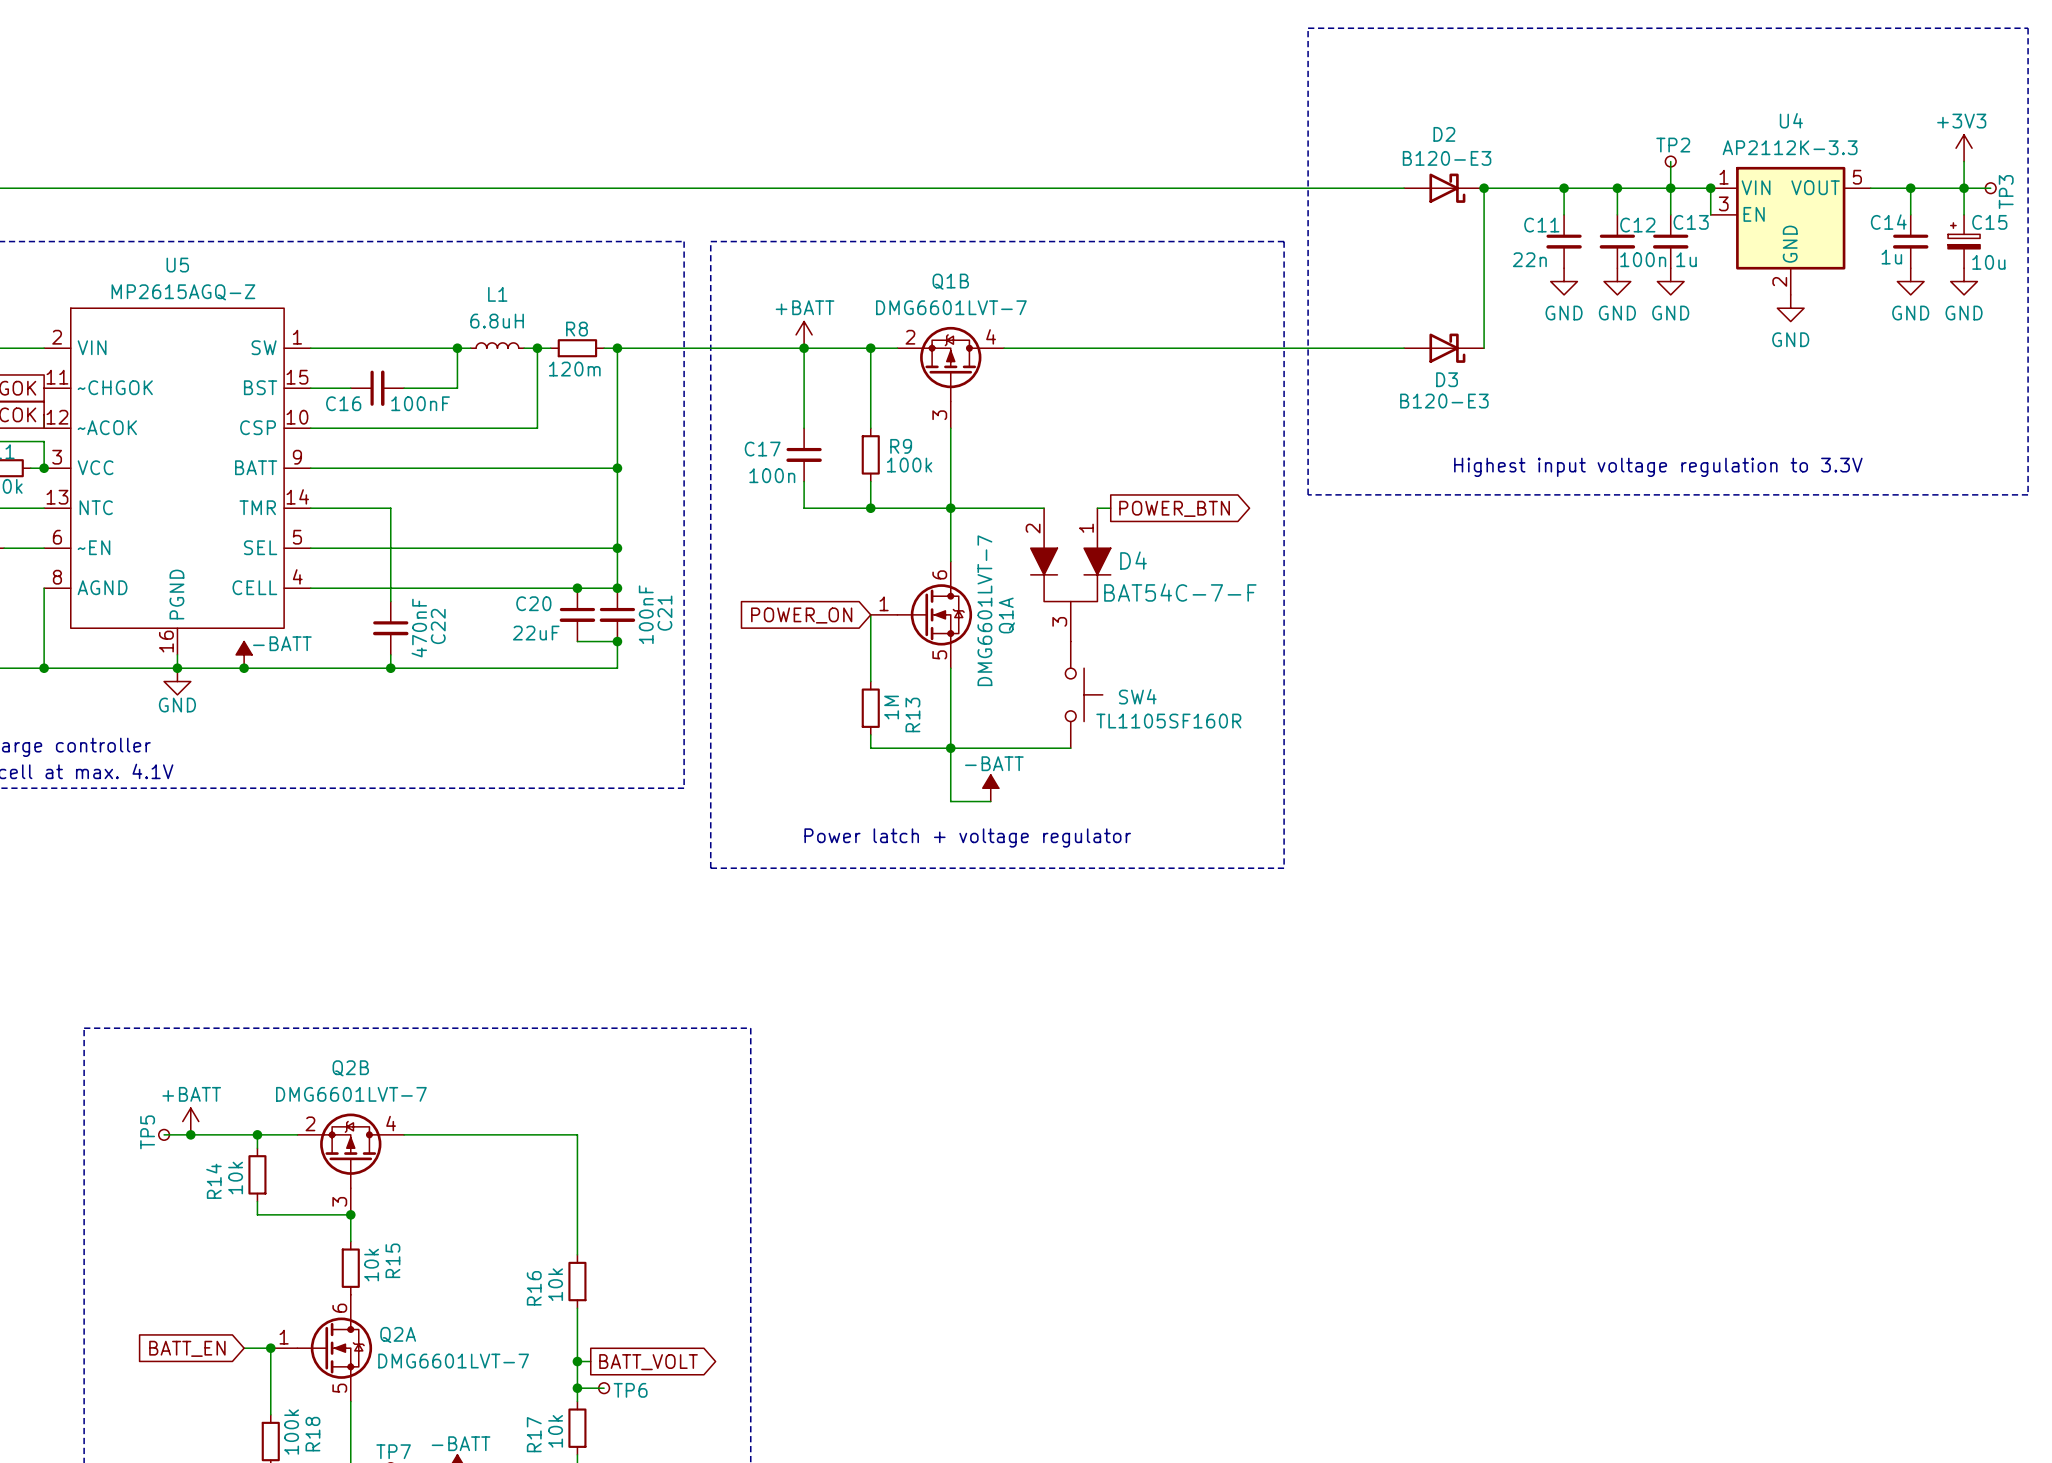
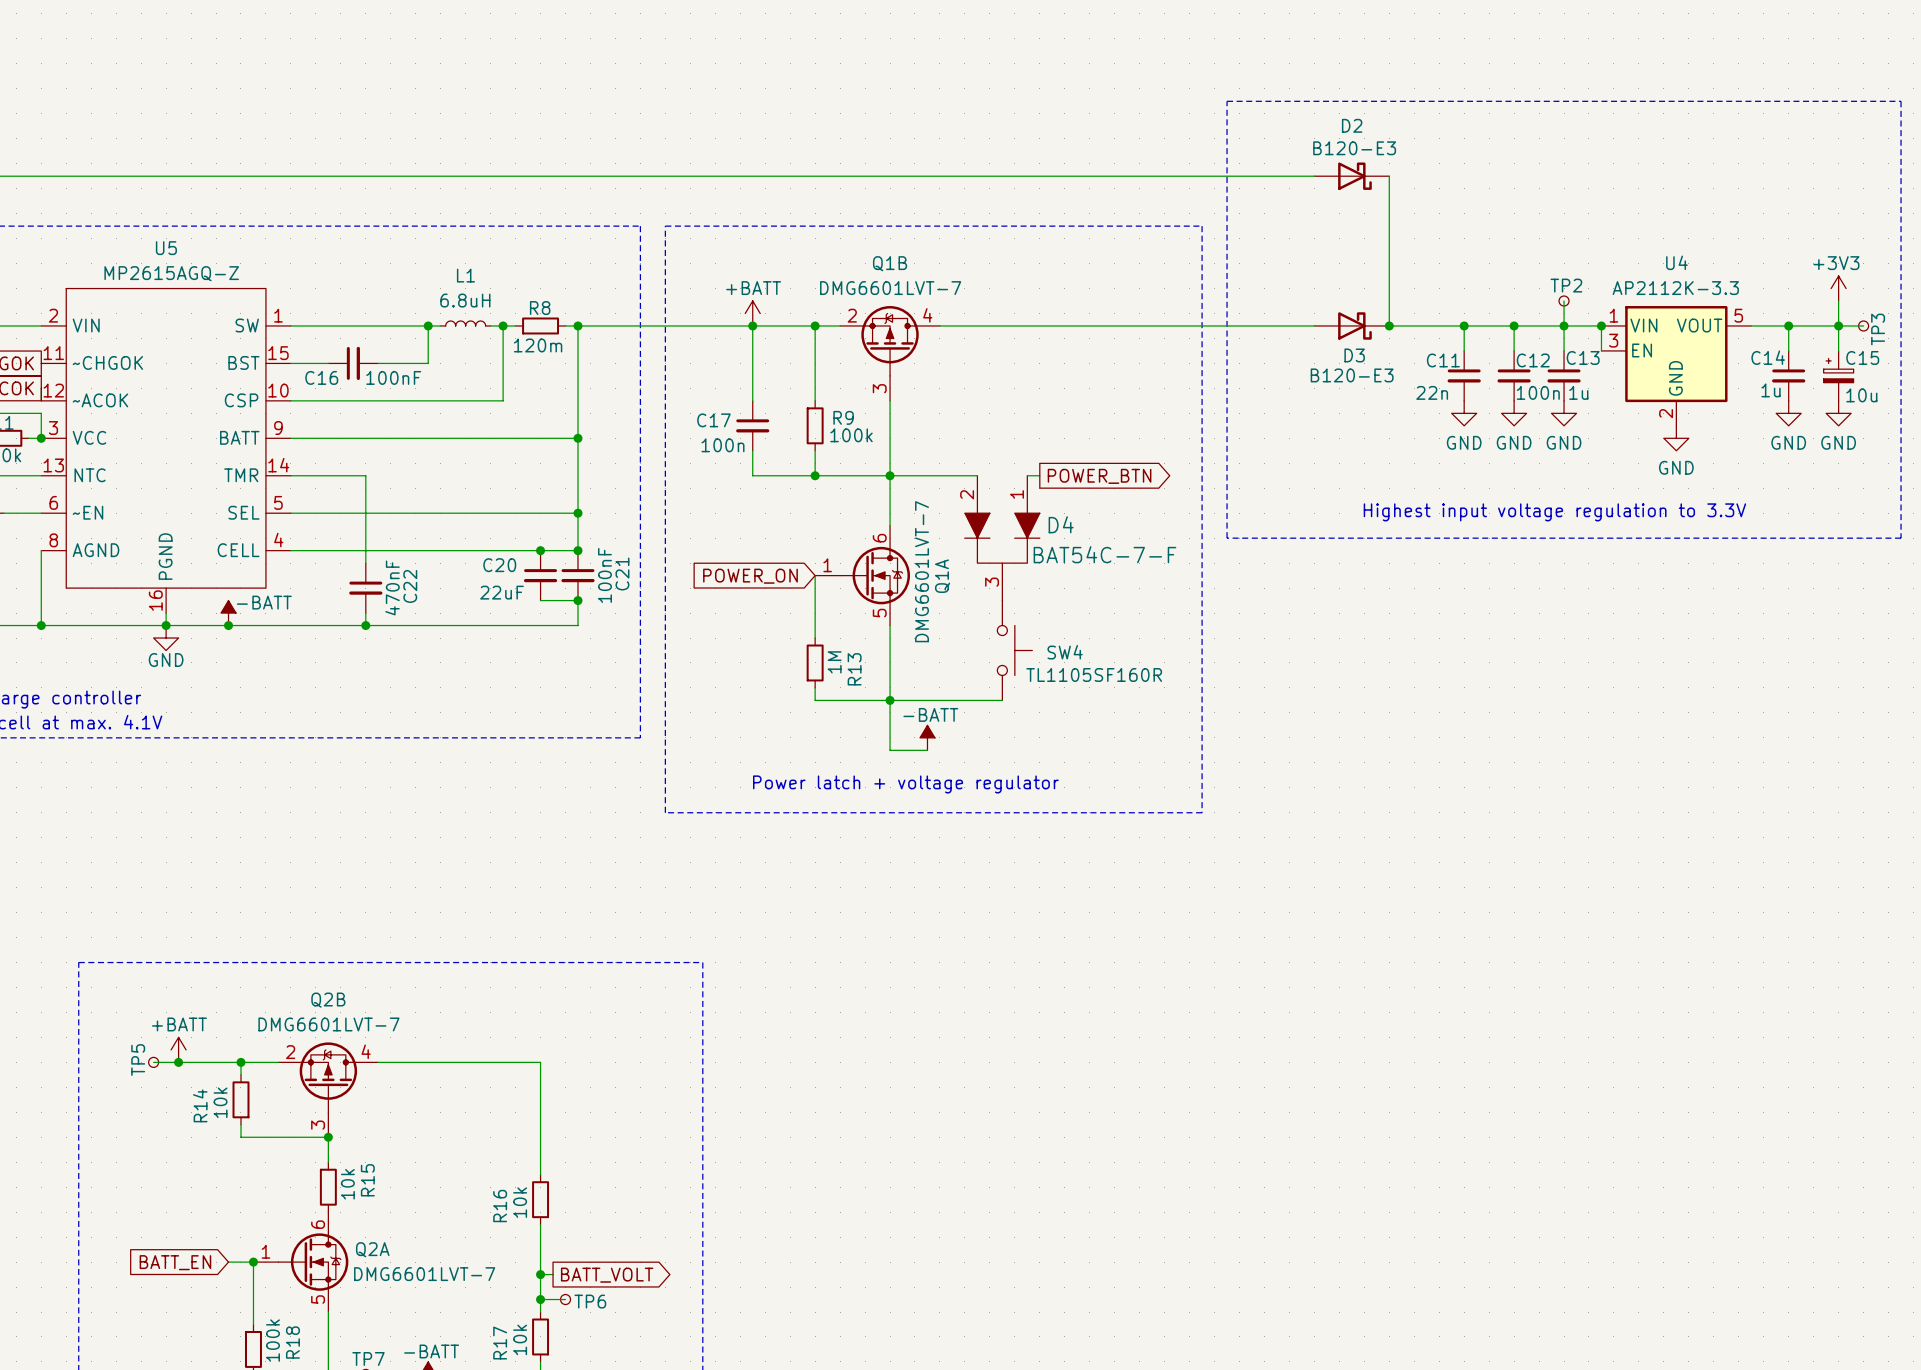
line: (1308, 28) (2028, 28) (2028, 494) (1308, 494) (1308, 28) -> (1227, 101) (1901, 101) (1901, 538) (1227, 538) (1227, 101)
power symbol position: +3V3 (1964, 148) -> +3V3 (1838, 288)
wire: (1670, 161) (1670, 214) -> (1564, 301) (1564, 350)
TP2 position: (1670, 161) -> (1564, 301)
wire: (1964, 161) (1964, 214) -> (1838, 301) (1838, 350)
wire: (1484, 188) (1710, 188) (1710, 214) -> (1389, 325) (1601, 325) (1601, 350)
junction: (1484, 188) -> none
wire: (1564, 188) (1564, 214) -> (1464, 325) (1464, 350)
junction: (1564, 188) -> none
wire: (1617, 188) (1617, 214) -> (1514, 325) (1514, 350)
junction: (1617, 188) -> none
junction: (1670, 188) -> none
junction: (1710, 188) -> none
wire: (1870, 188) (1990, 188) -> (1751, 325) (1863, 325)
wire: (1910, 188) (1910, 214) -> (1788, 325) (1788, 350)
junction: (1910, 188) -> none
junction: (1964, 188) -> none
TP3 position: (1990, 188) -> (1863, 325)
U4 position: (1790, 230) -> (1676, 365)
C11 position: (1564, 241) -> (1464, 375)
C12 position: (1617, 241) -> (1514, 375)
C13 position: (1670, 241) -> (1564, 375)
C14 position: (1910, 241) -> (1788, 375)
C15 position: (1964, 241) -> (1838, 375)
power symbol: GND (1564, 281) -> none
power symbol: GND (1617, 281) -> none
power symbol: GND (1670, 281) -> none
power symbol: GND (1910, 281) -> none
power symbol: GND (1964, 281) -> none
power symbol: GND (1790, 308) -> none
junction: none -> (1389, 325)
junction: none -> (1464, 325)
junction: none -> (1514, 325)
junction: none -> (1564, 325)
junction: none -> (1601, 325)
junction: none -> (1788, 325)
junction: none -> (1838, 325)
power symbol: none -> GND (1464, 413)
power symbol: none -> GND (1514, 413)
power symbol: none -> GND (1564, 413)
power symbol: none -> GND (1788, 413)
power symbol: none -> GND (1838, 413)
text position: Highest input voltage regulation to 3.3V (1658, 467) -> Highest input voltage regulation to 3.3V (1554, 512)
power symbol: none -> GND (1676, 438)

